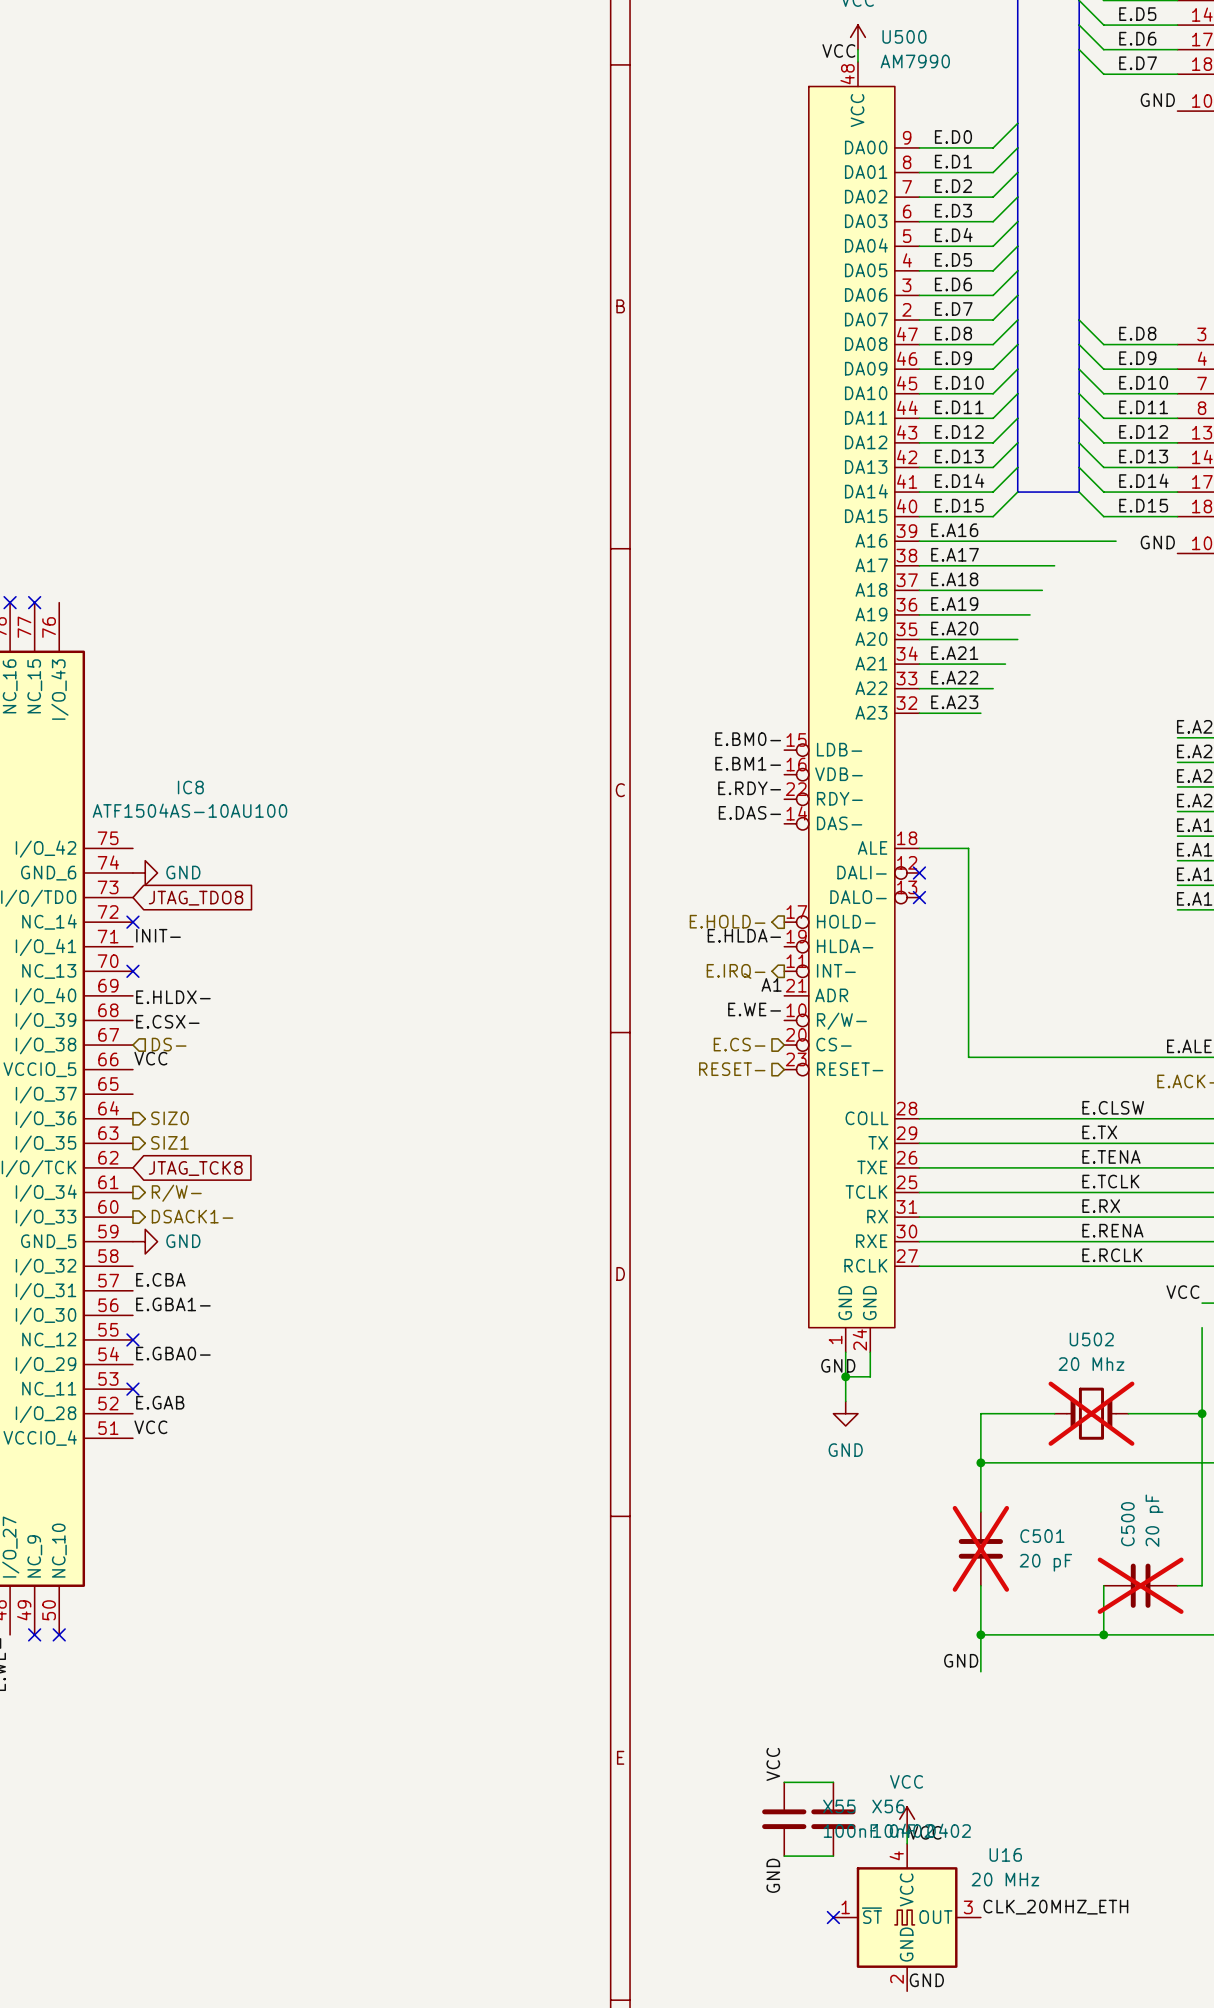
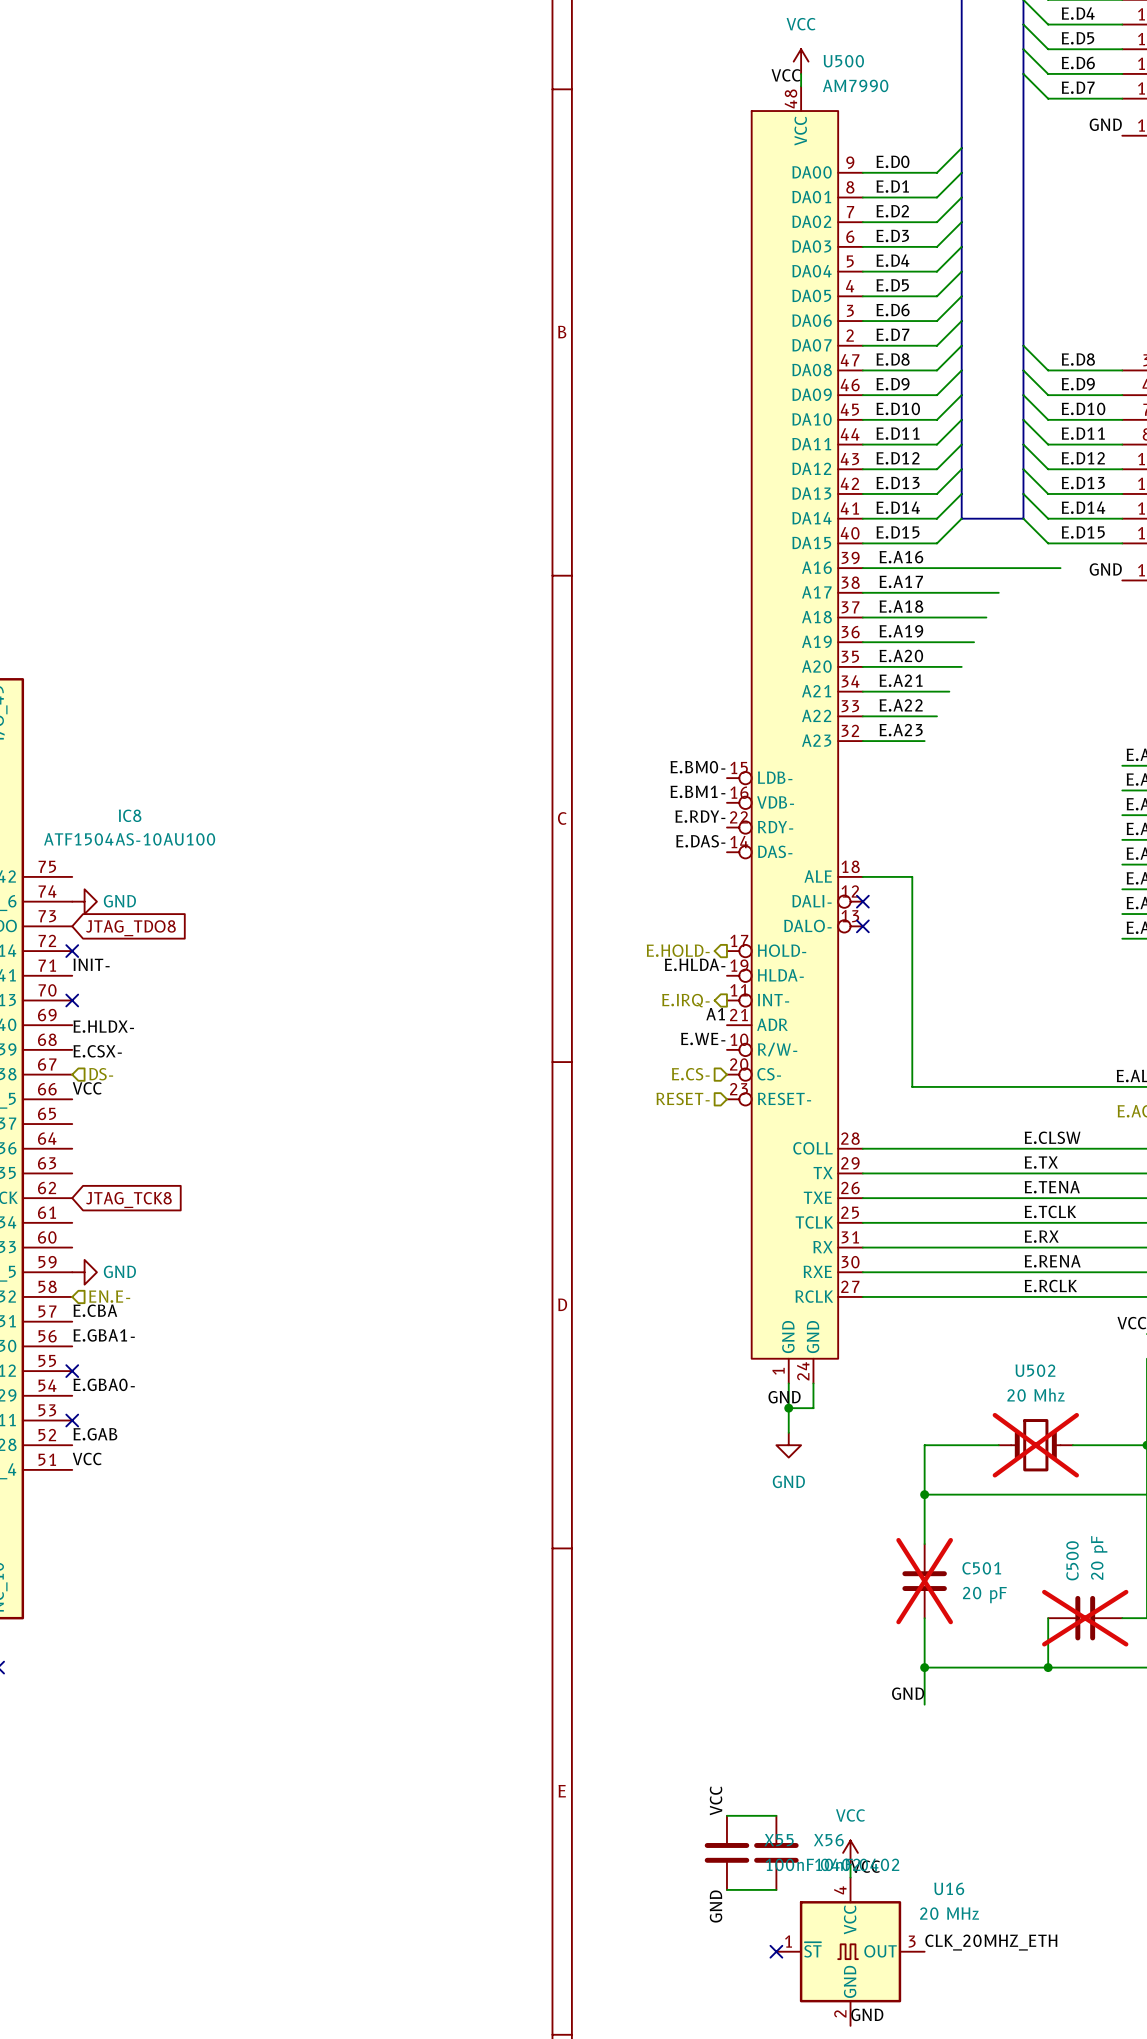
hierarchical label: SIZ0 (170, 1118) -> none
hierarchical label: SIZ1 (170, 1142) -> none
hierarchical label: R/W- (176, 1193) -> none
hierarchical label: DSACK1- (192, 1216) -> none
hierarchical label: none -> EN.E- (109, 1296)

